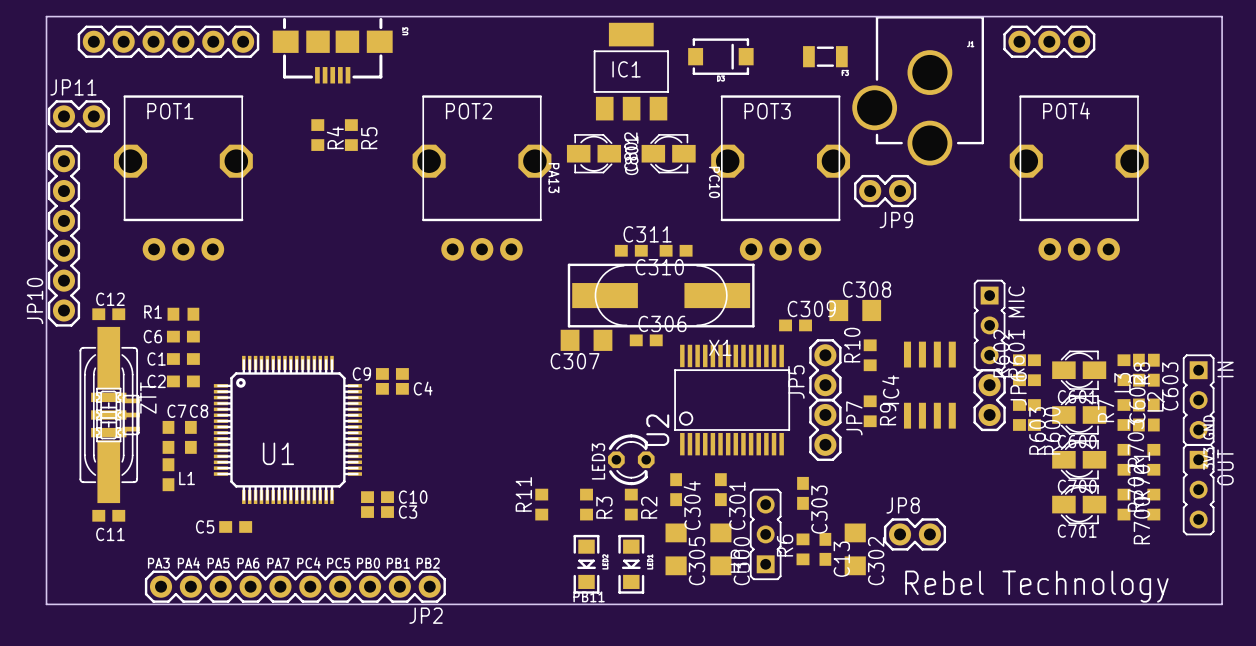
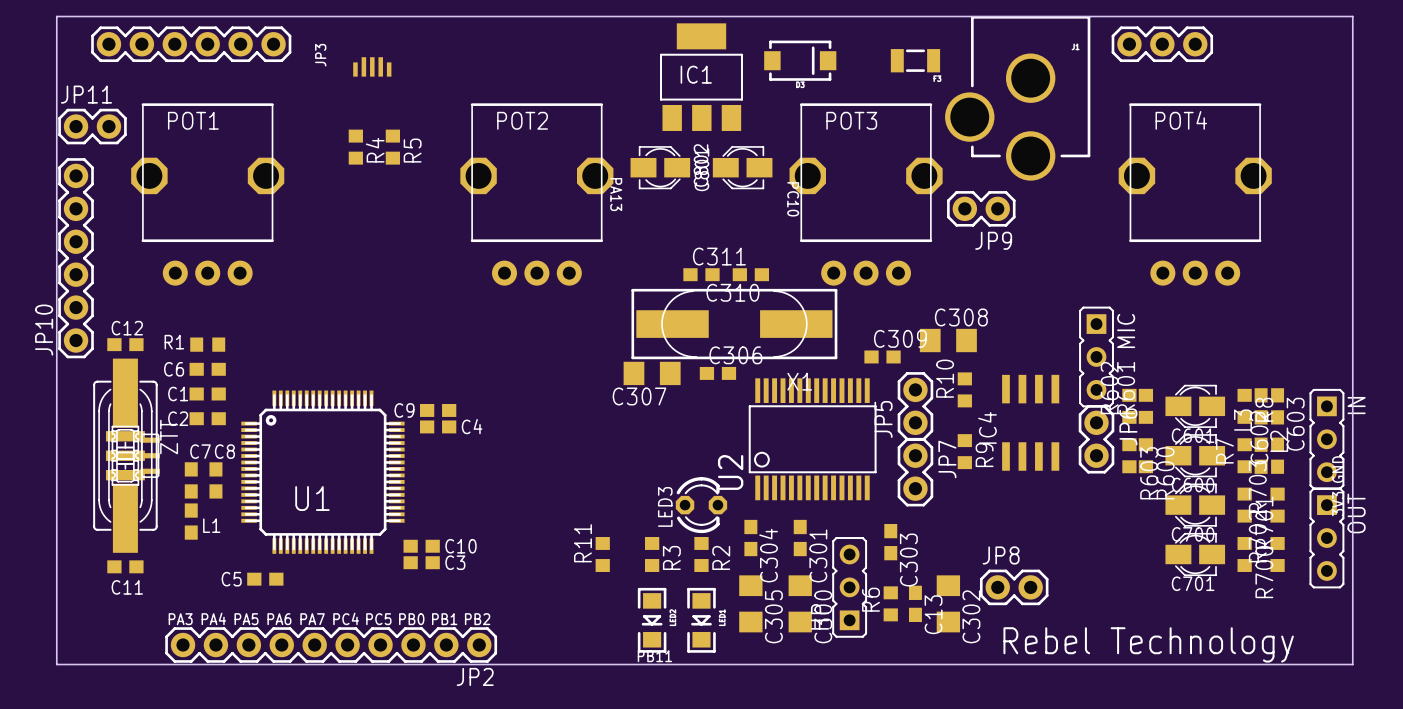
part: (332, 50) -> none
JP3: none -> (372, 66)

